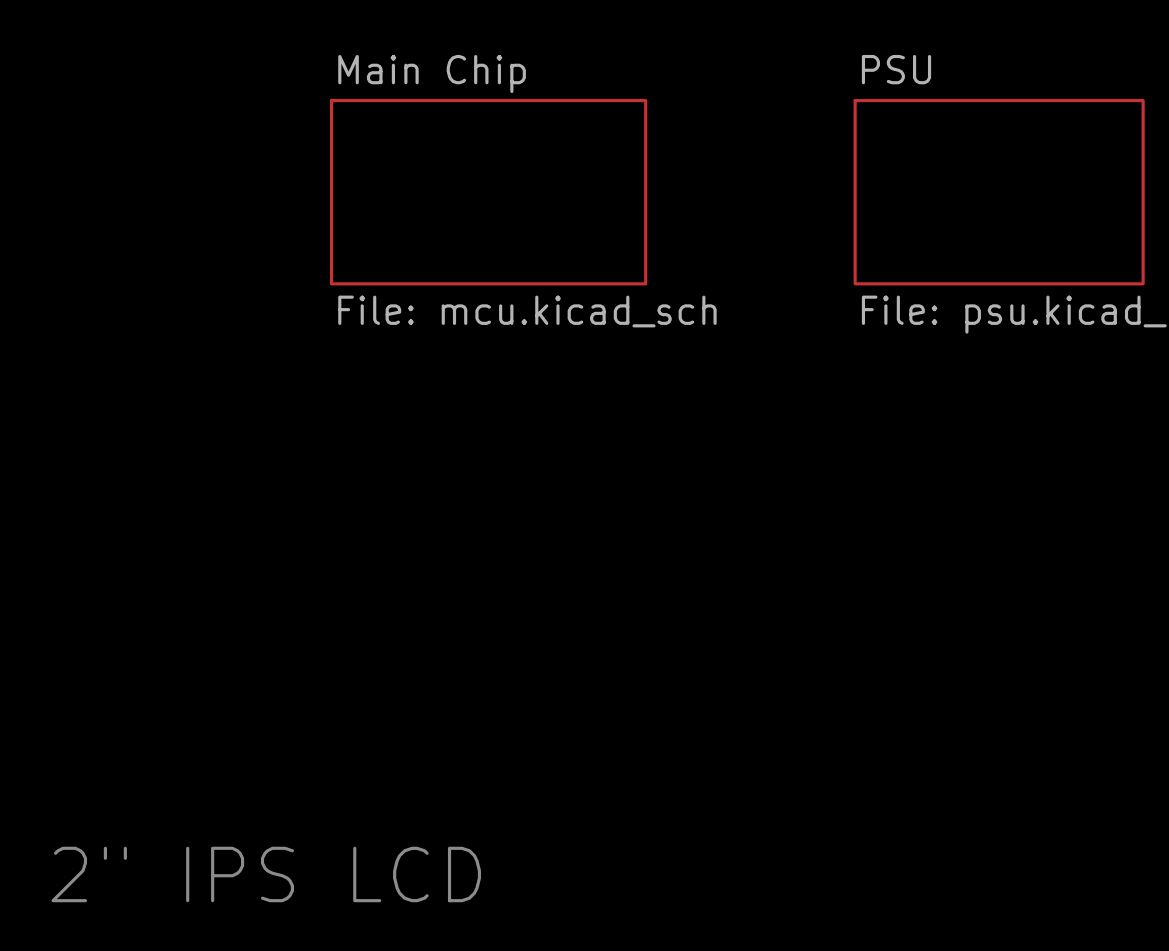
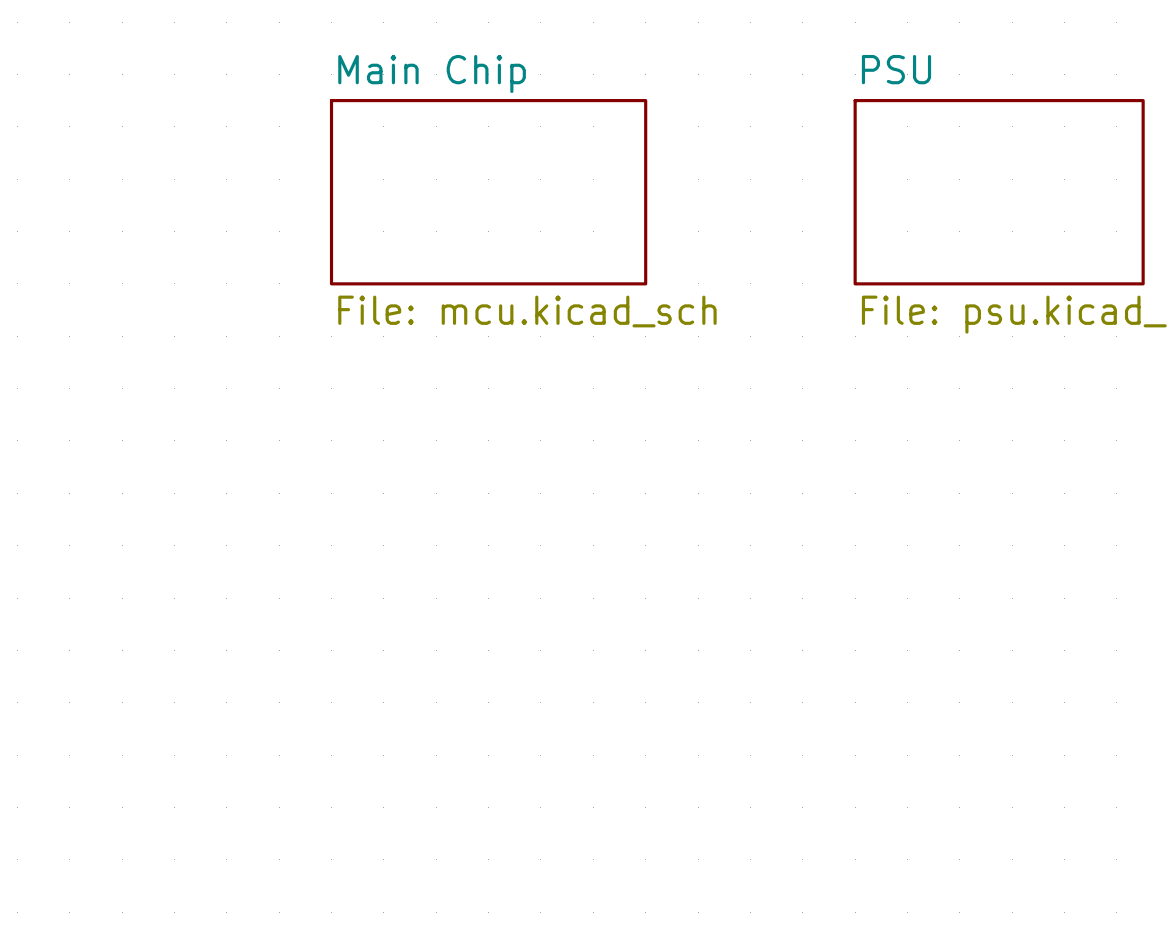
text: 2" IPS LCD (266, 874) -> none

